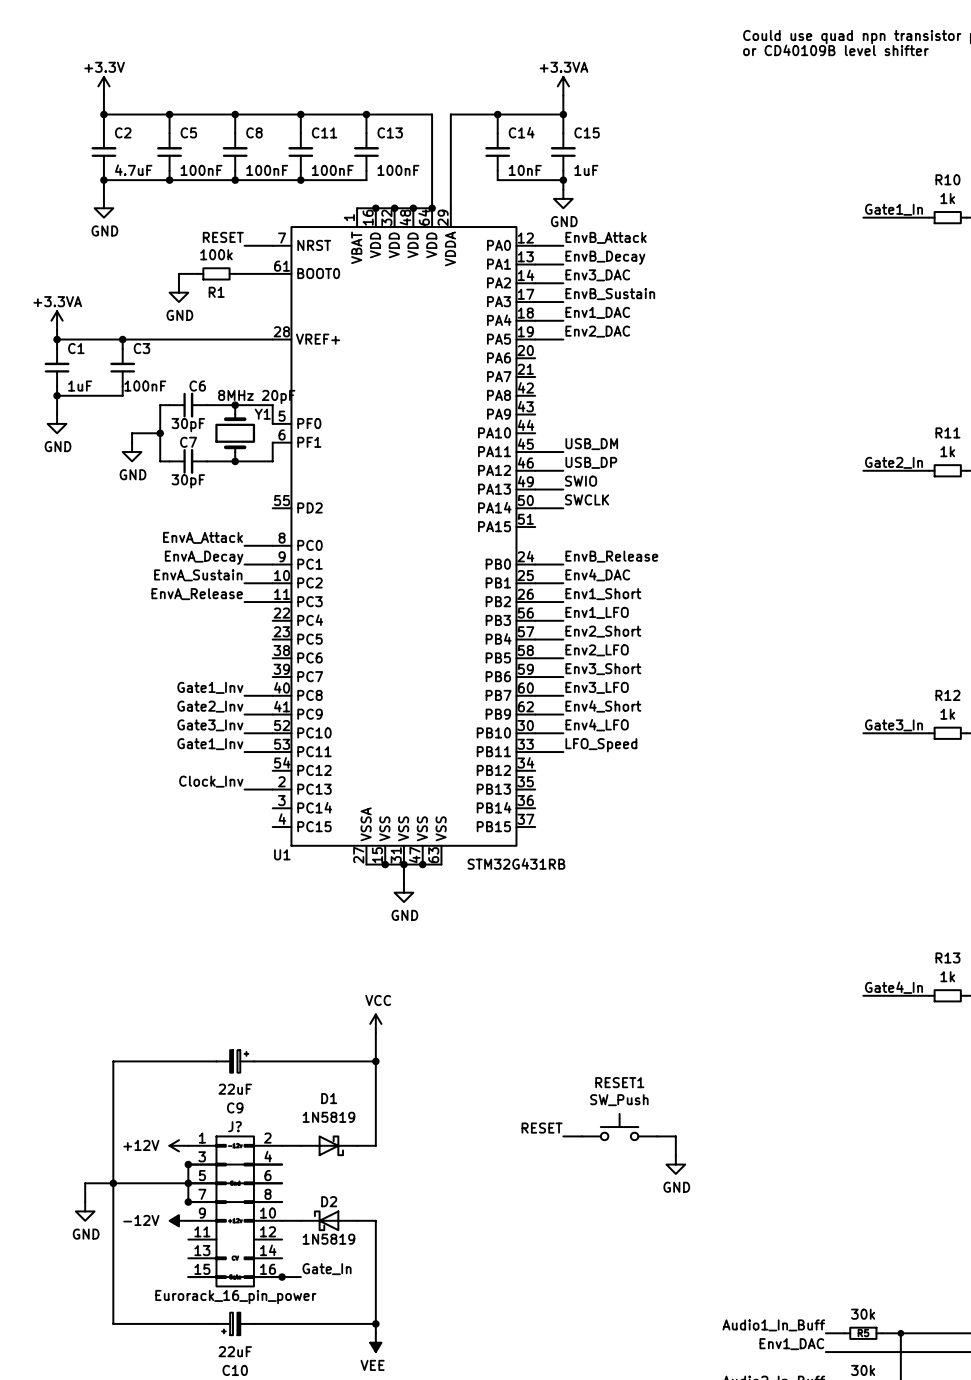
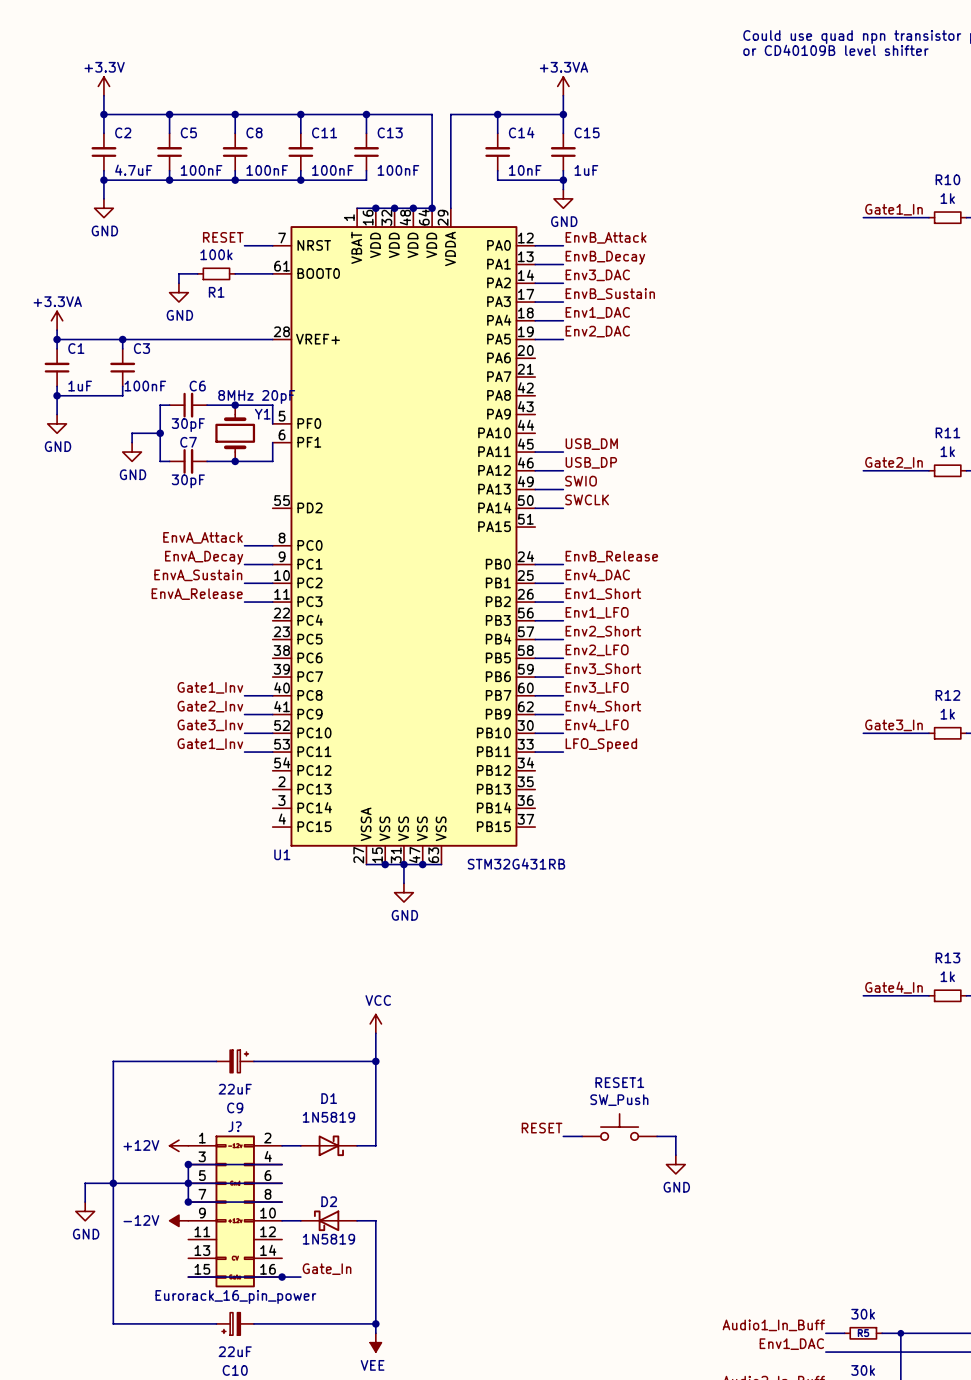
label: Clock_Inv (211, 781) -> none
wire: (244, 789) (272, 789) -> none

